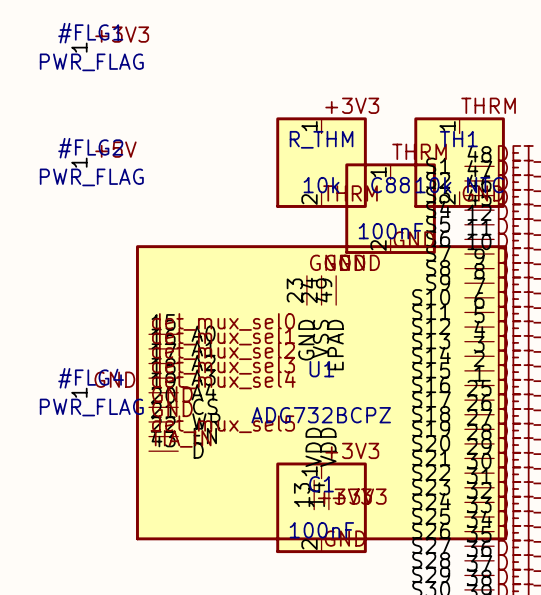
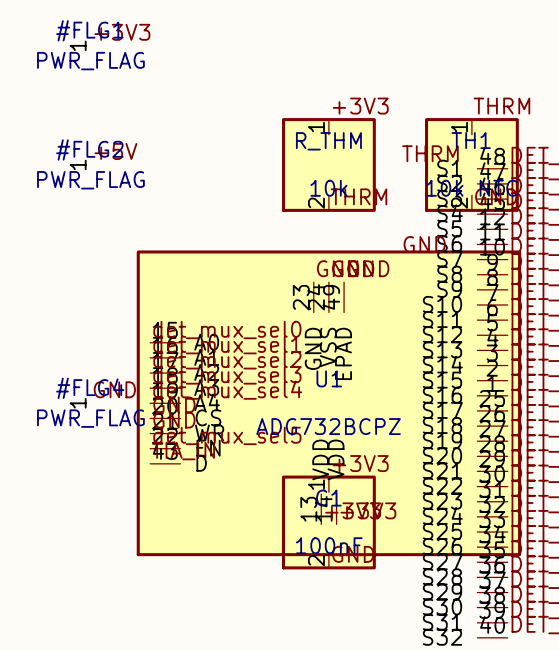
C88: 100nF (390, 208) -> none

